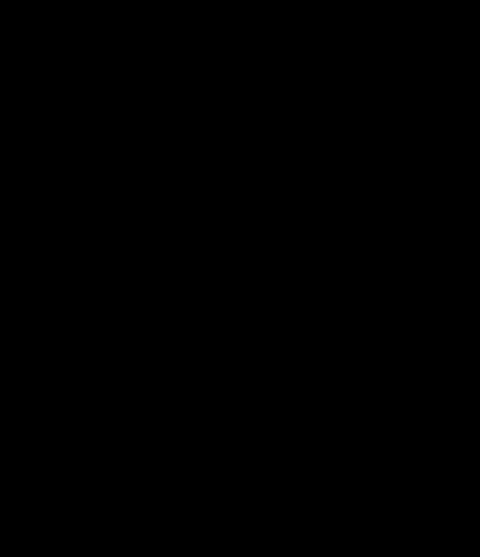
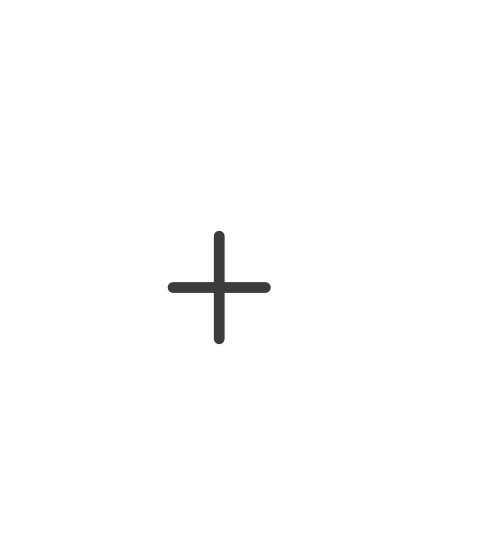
text: none -> + (219, 287)

